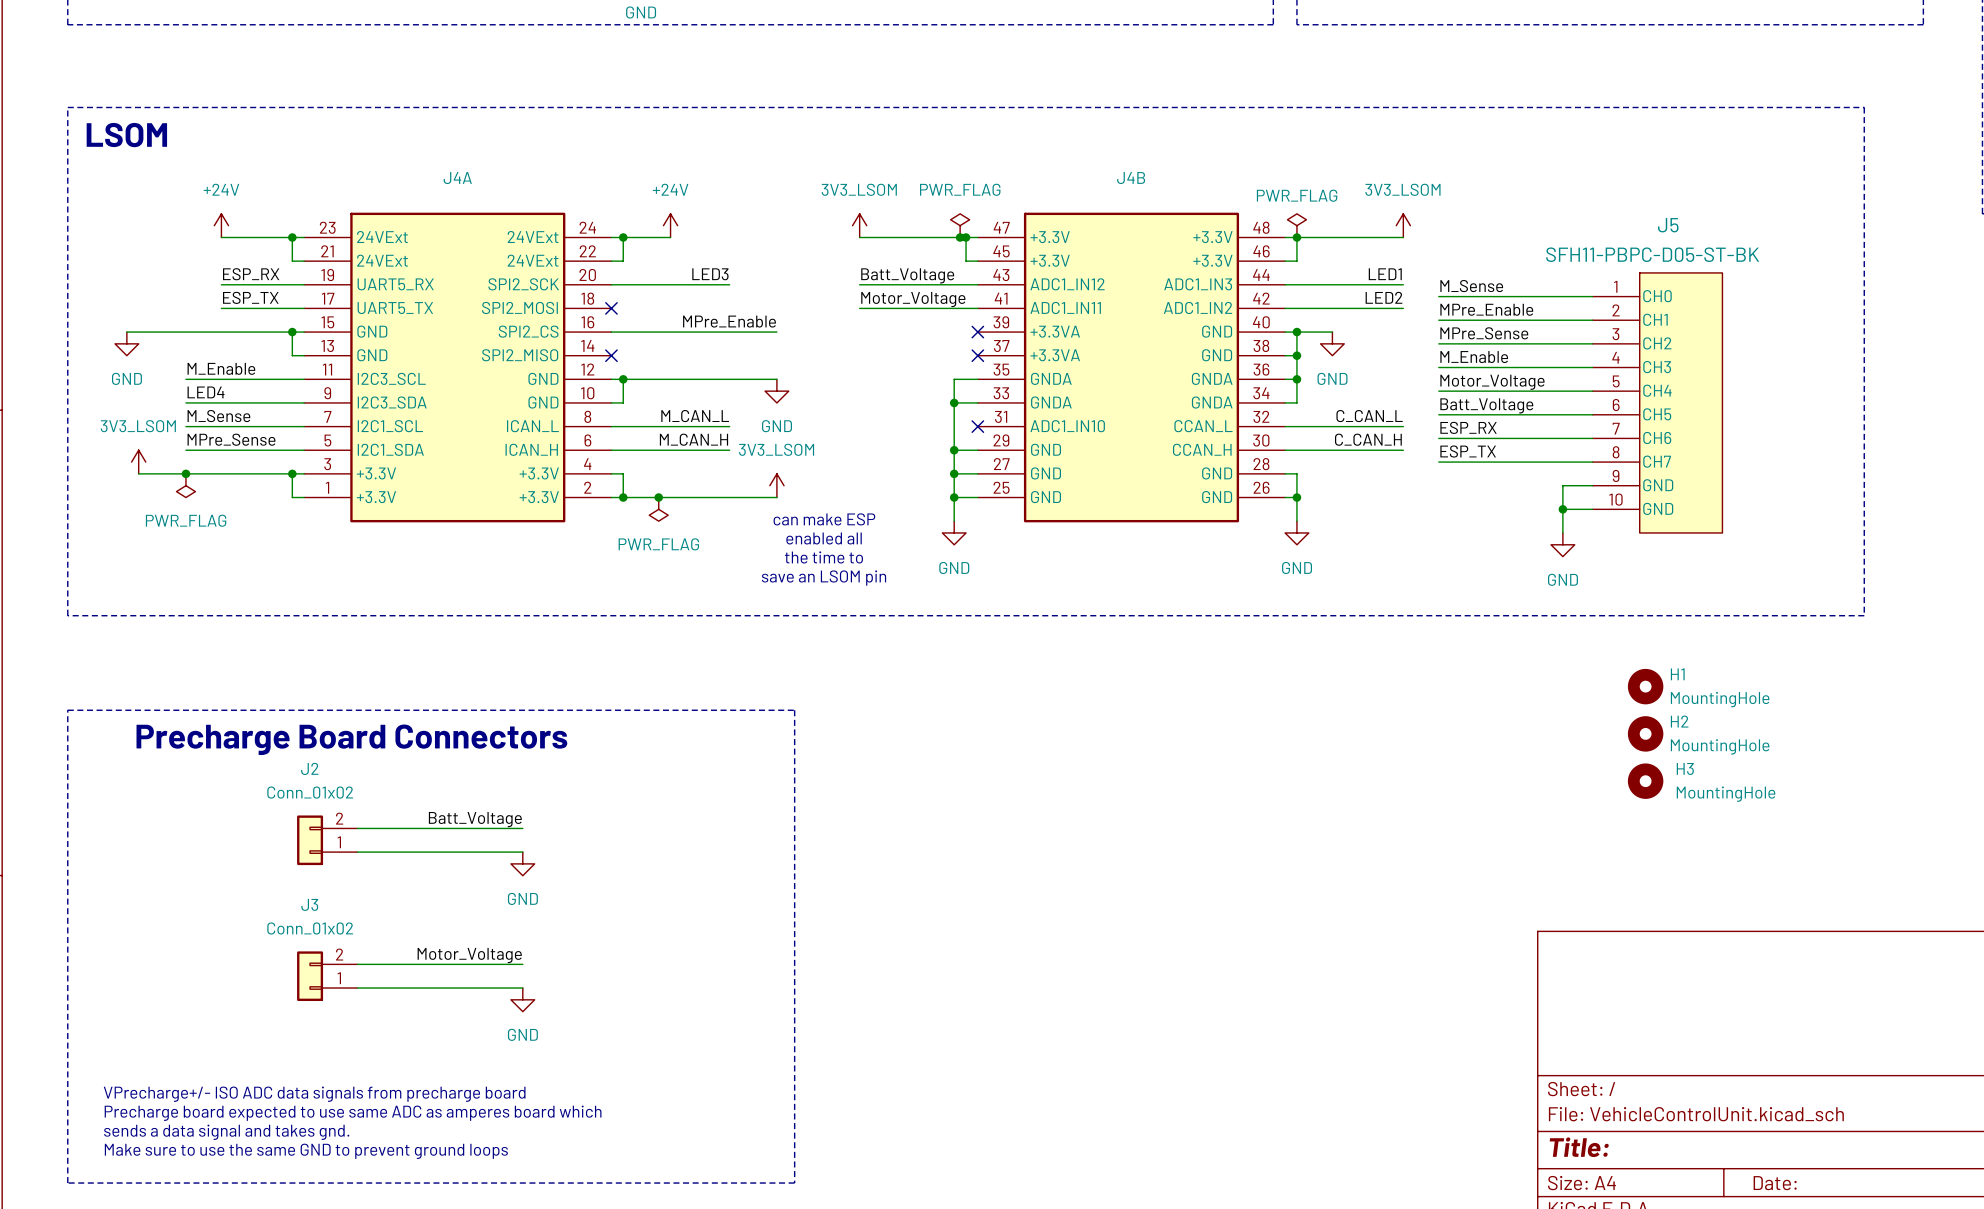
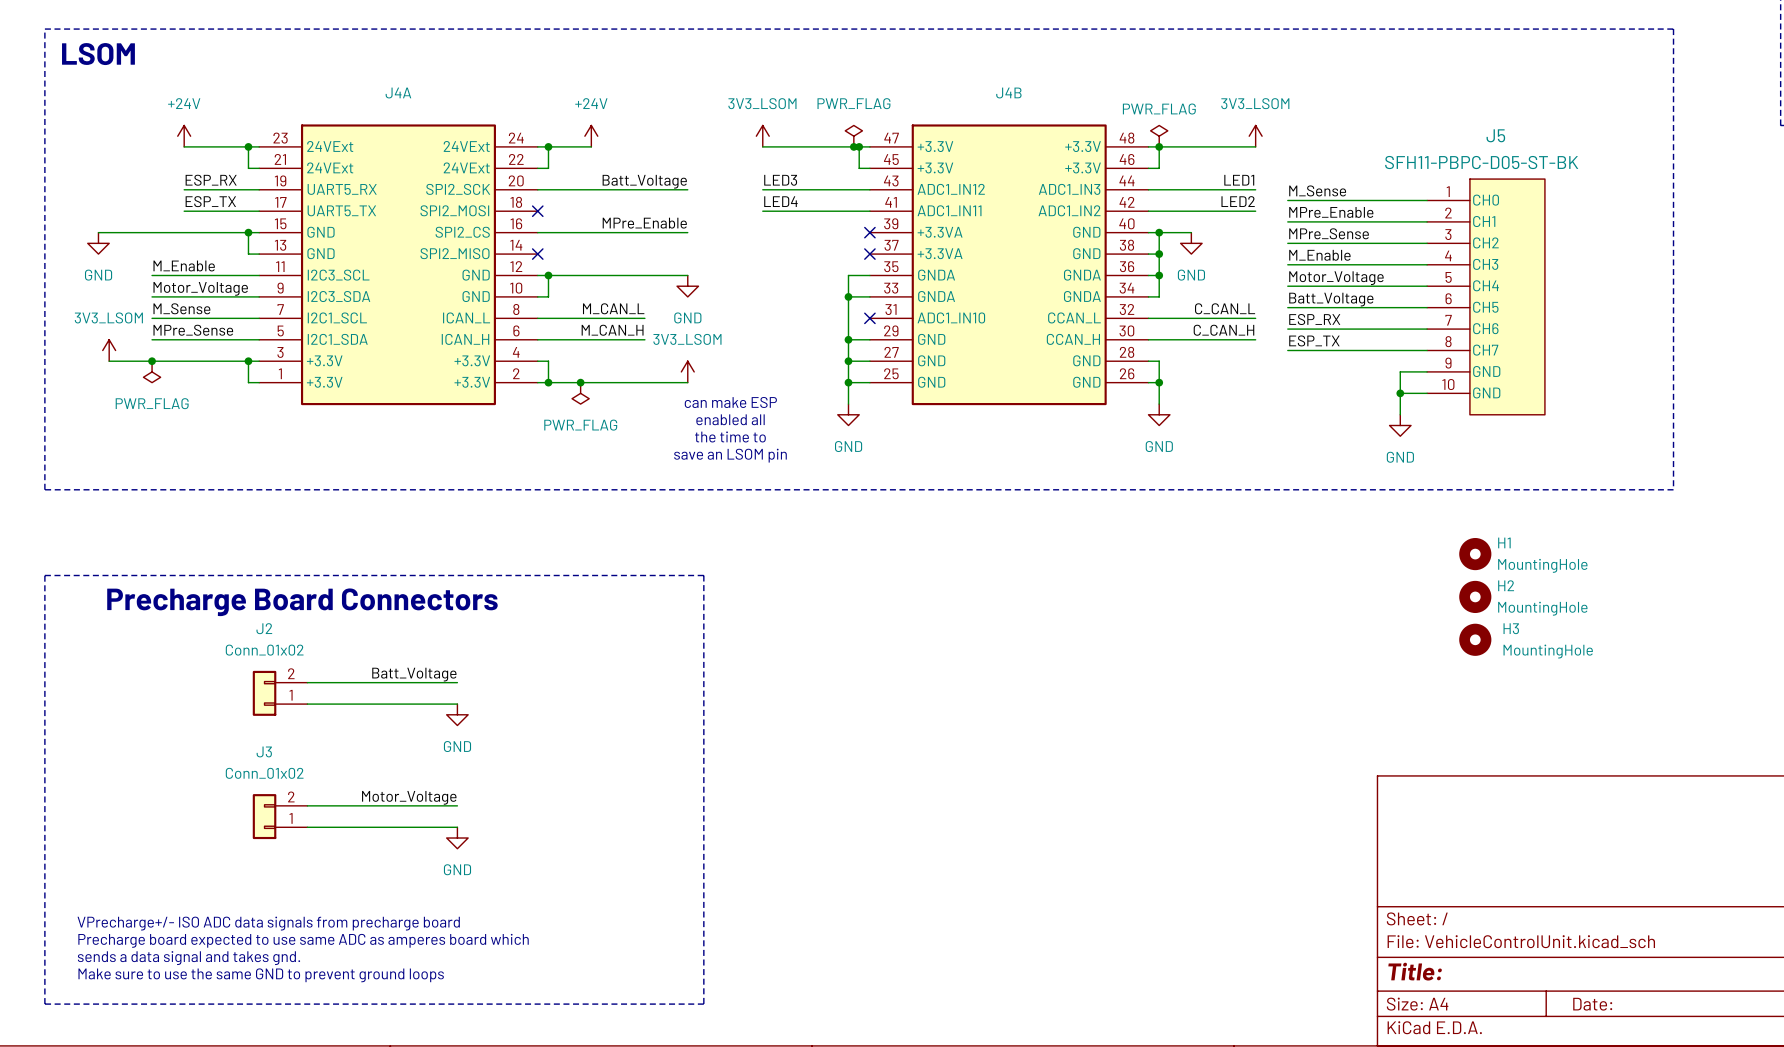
label: LED3 (710, 274) -> none
label: none -> Batt_Voltage (644, 181)
label: Batt_Voltage (907, 275) -> LED3 (780, 180)
wire: none -> (644, 189) (687, 189)
label: Motor_Voltage (913, 299) -> LED4 (780, 201)
label: LED4 (206, 392) -> Motor_Voltage (200, 288)

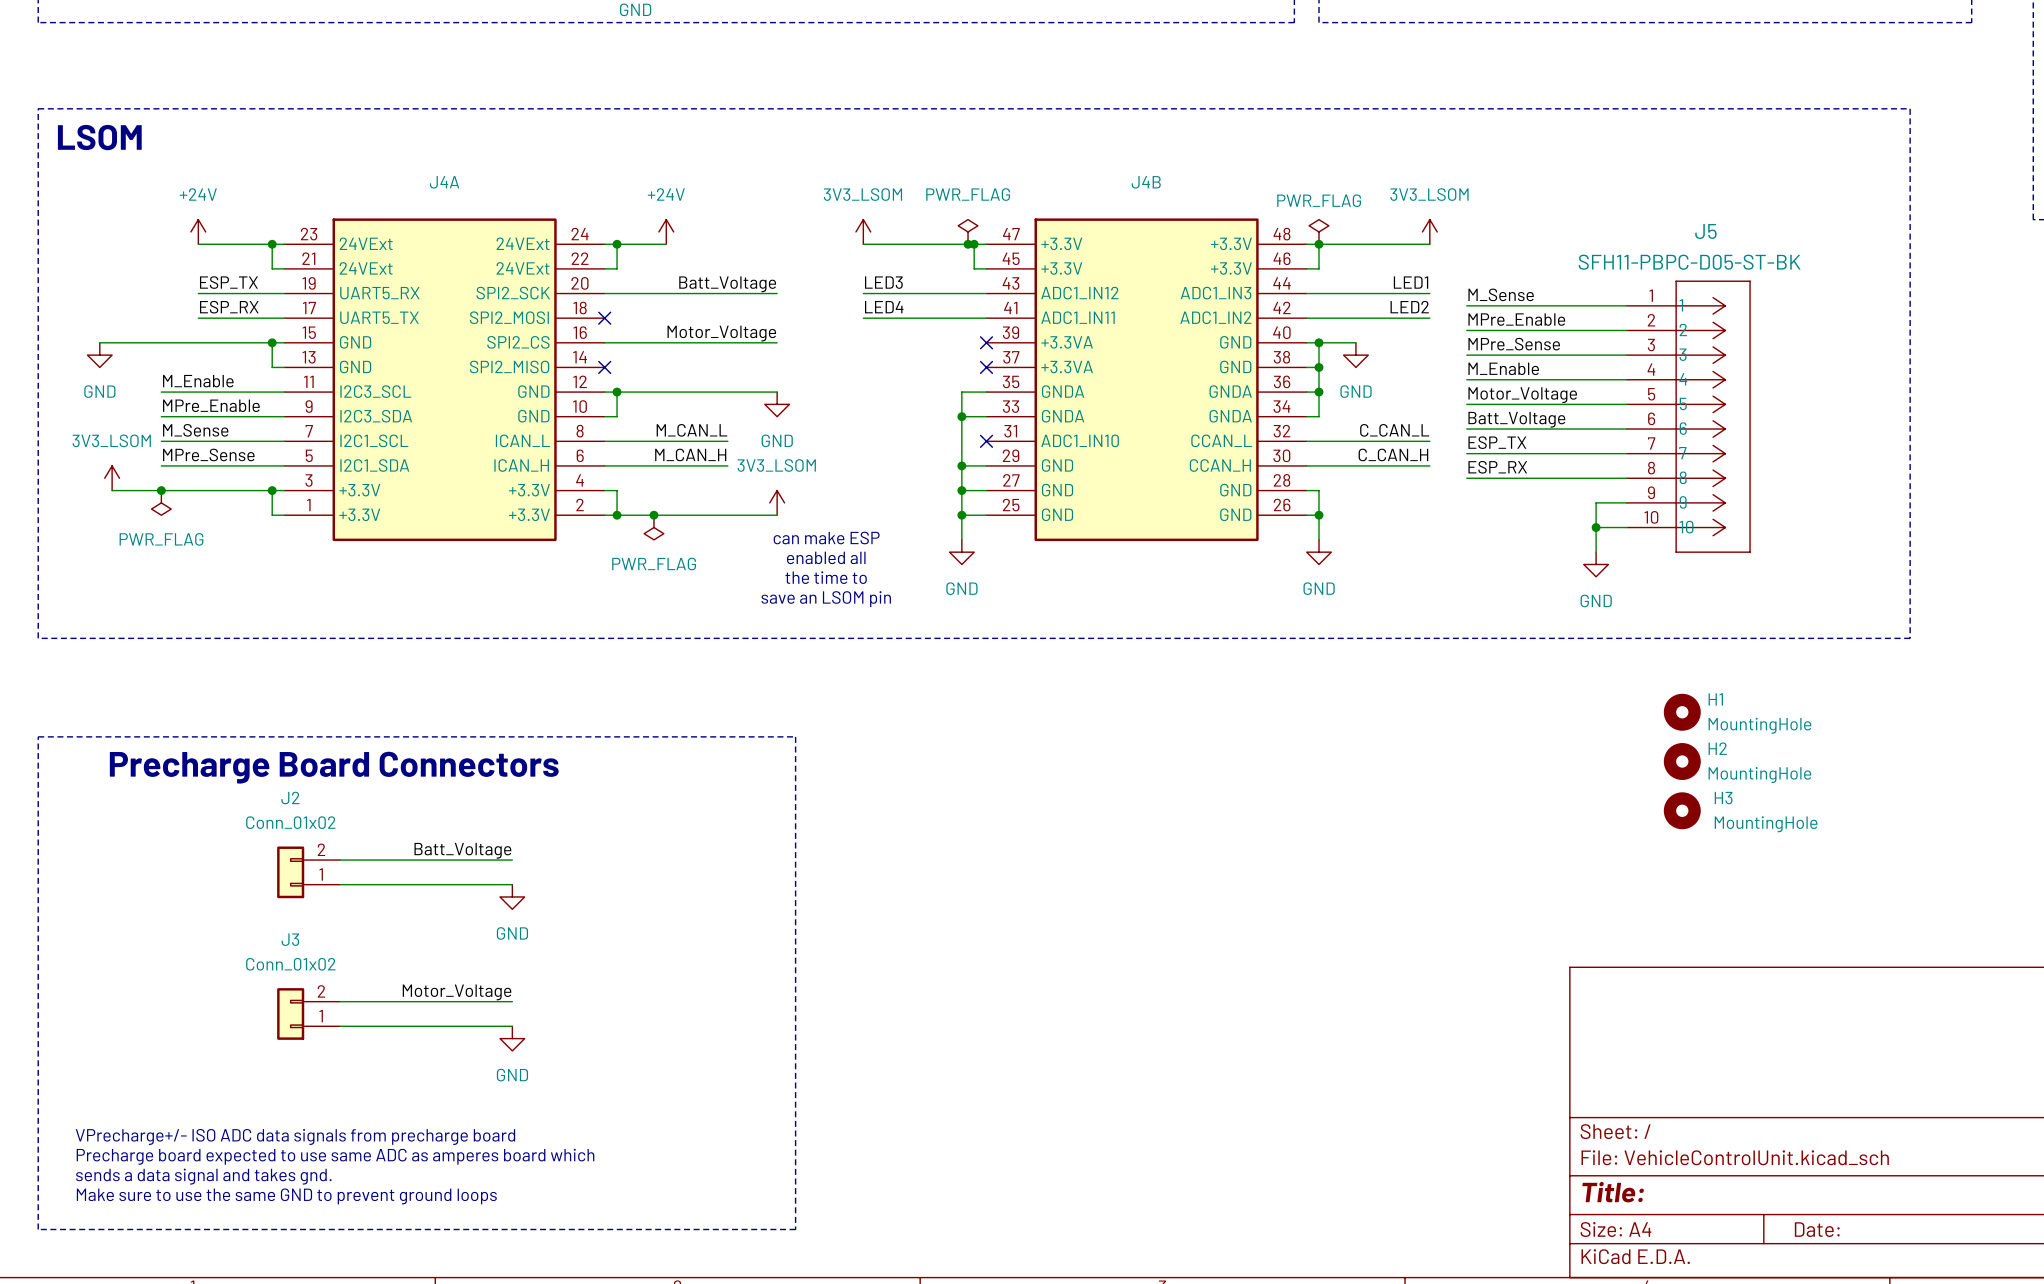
J5 symbol: [1427, 179, 1545, 415] -> [1626, 280, 1751, 553]
label: ESP_RX (211, 180) -> ESP_TX (228, 282)
label: ESP_TX (210, 201) -> ESP_RX (229, 307)
label: MPre_Enable (644, 223) -> Motor_Voltage (721, 333)
label: Motor_Voltage (200, 288) -> MPre_Enable (211, 405)
label: ESP_RX (1314, 319) -> ESP_TX (1497, 442)
label: ESP_TX (1314, 340) -> ESP_RX (1497, 467)

